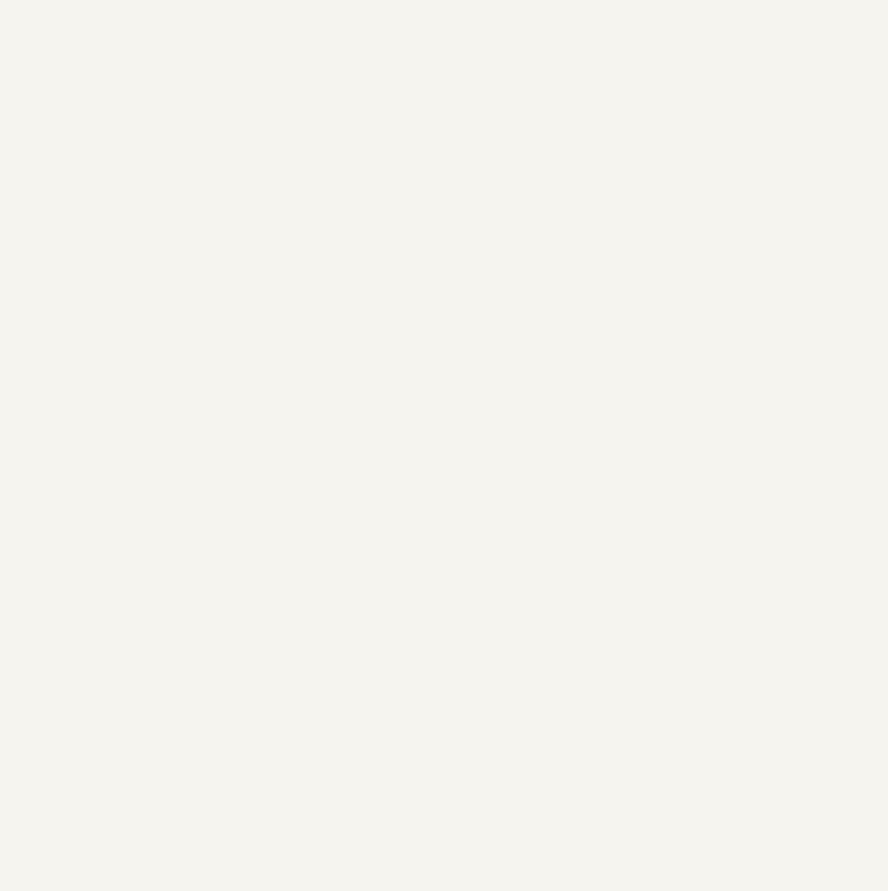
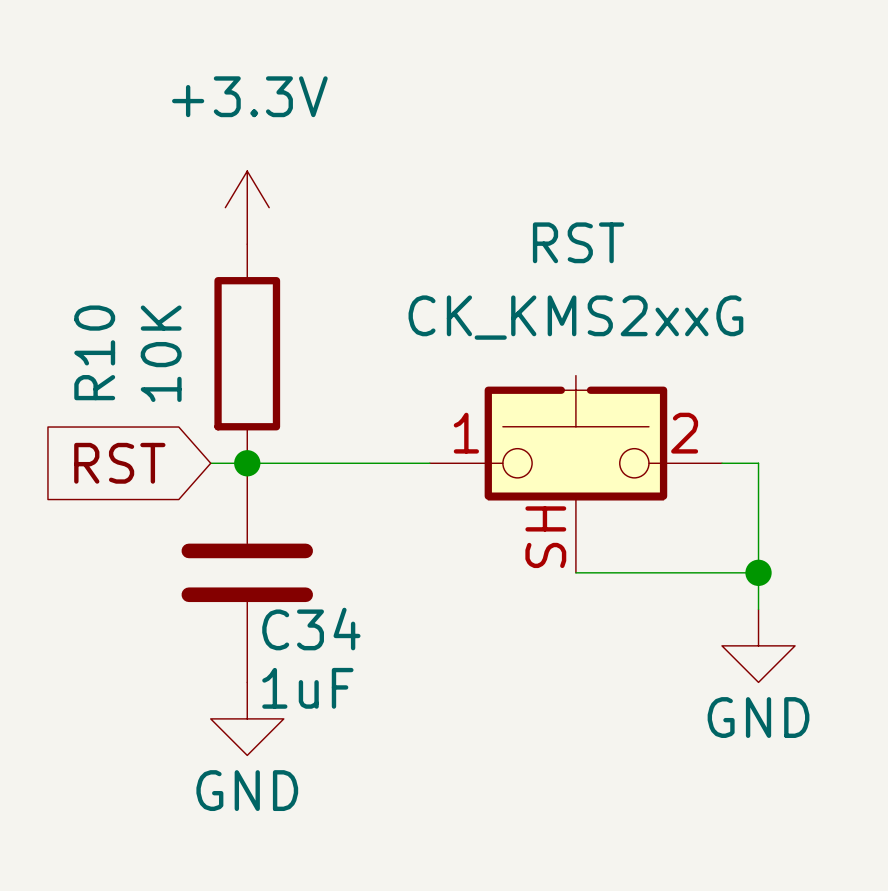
power symbol: none -> +3.3V (247, 207)
R10: none -> 10K (247, 353)
global label: none -> RST (119, 463)
wire: none -> (210, 463) (429, 463)
junction: none -> (247, 463)
wire: none -> (722, 463) (758, 463) (758, 609)
RST: none -> CK_KMS2xxG (575, 474)
C34: none -> 1uF (247, 572)
wire: none -> (575, 572) (758, 572)
junction: none -> (758, 572)
power symbol: none -> GND (758, 645)
power symbol: none -> GND (247, 718)

